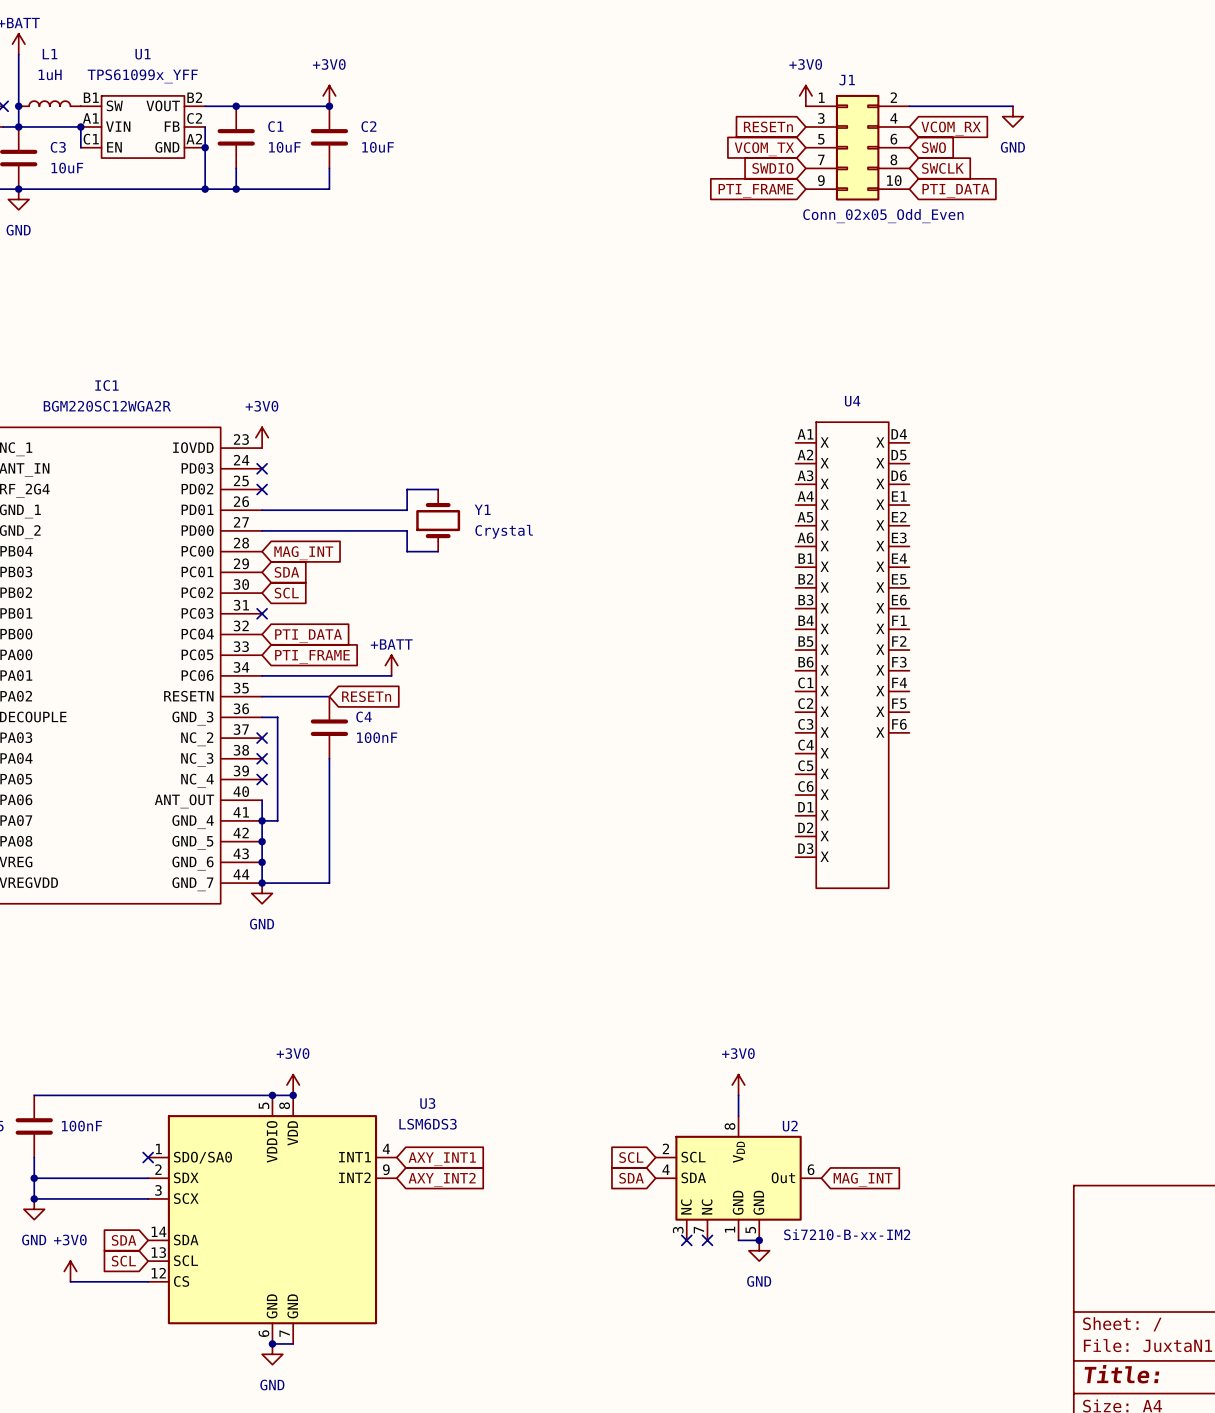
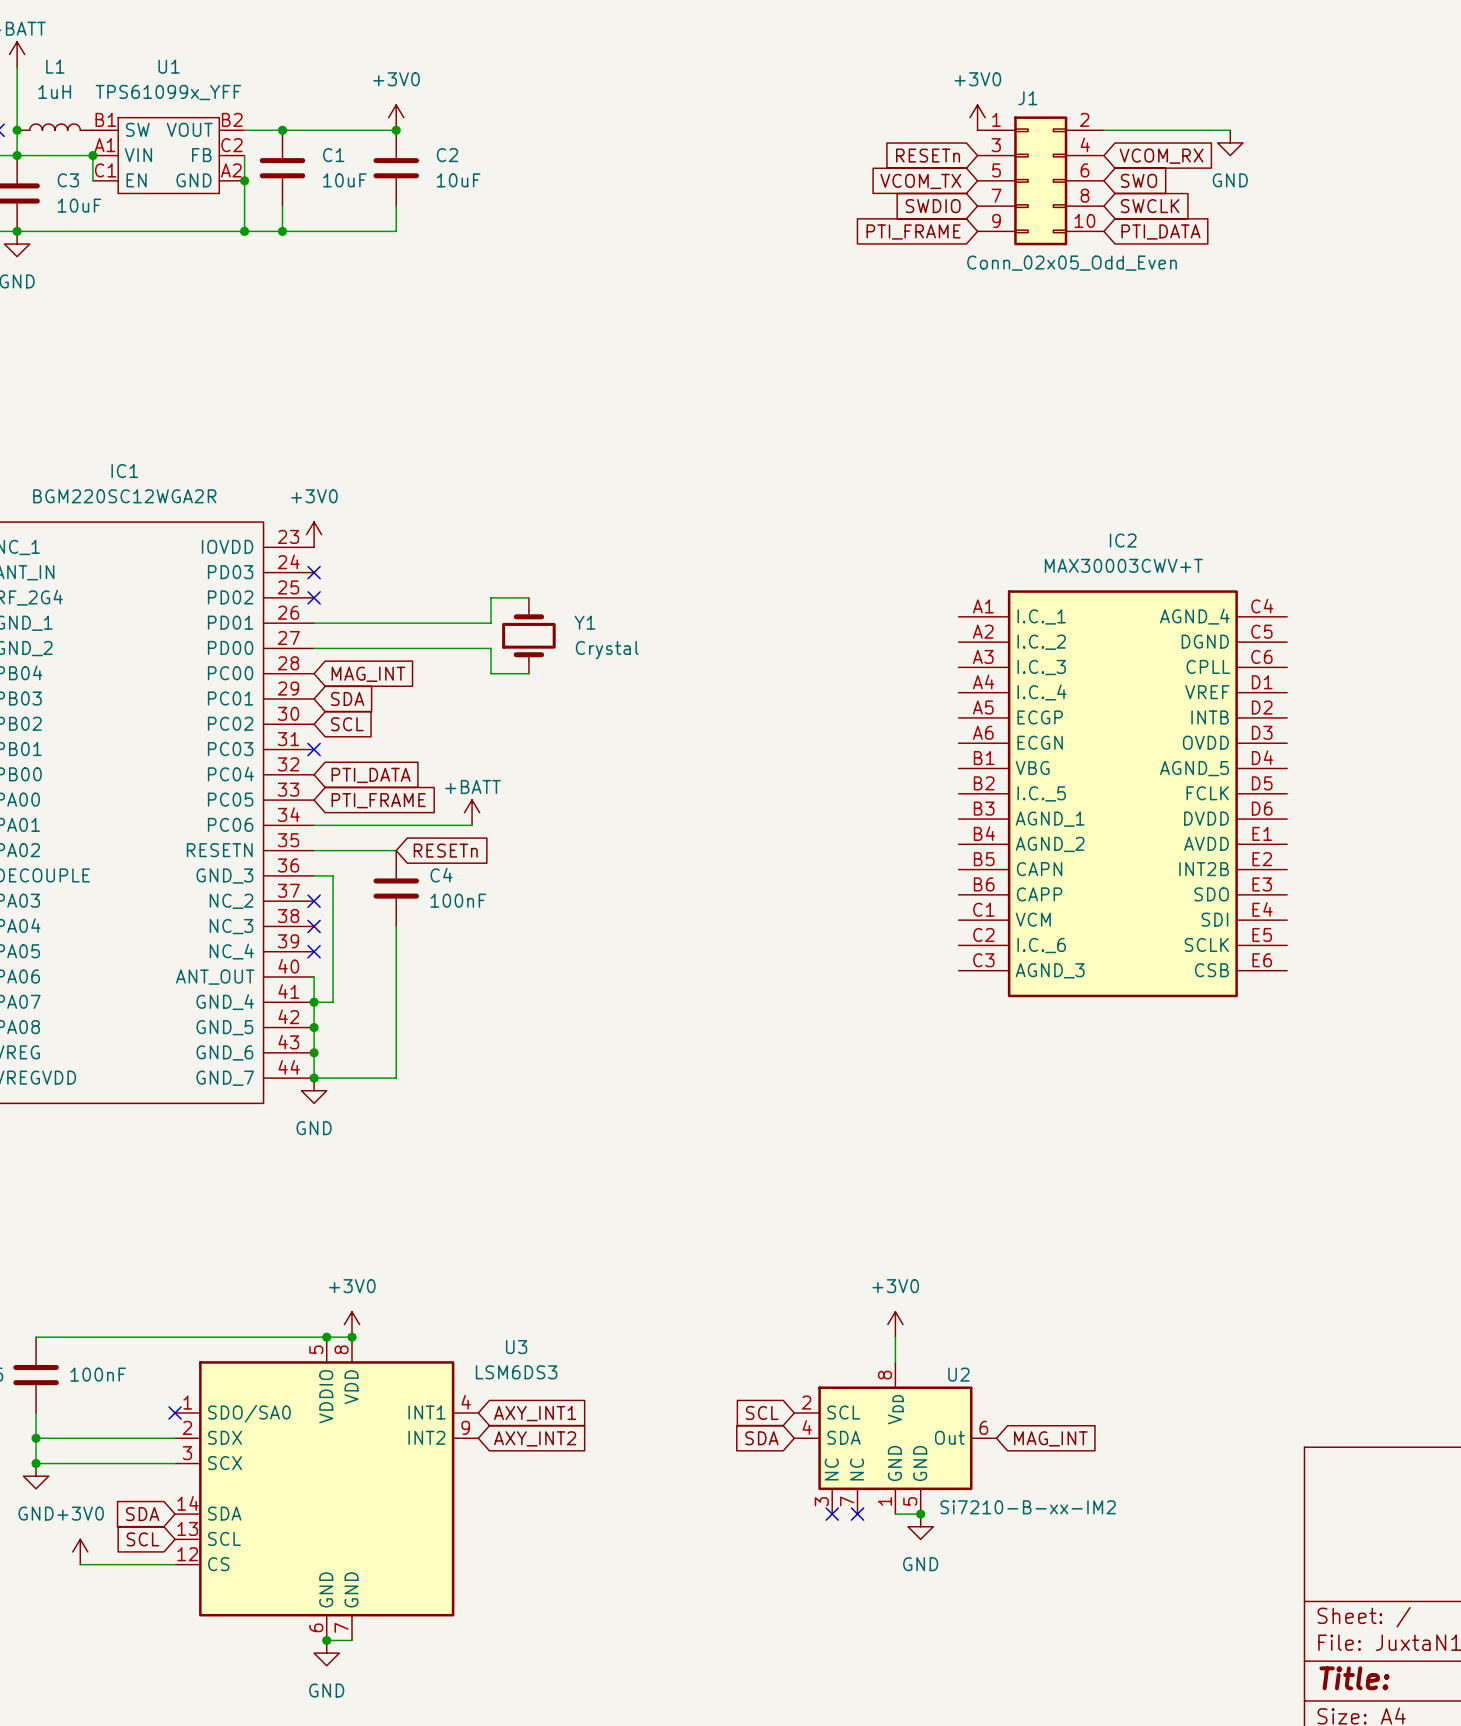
IC2: none -> MAX30003CWV+T (1122, 793)
U4: (852, 655) -> none

